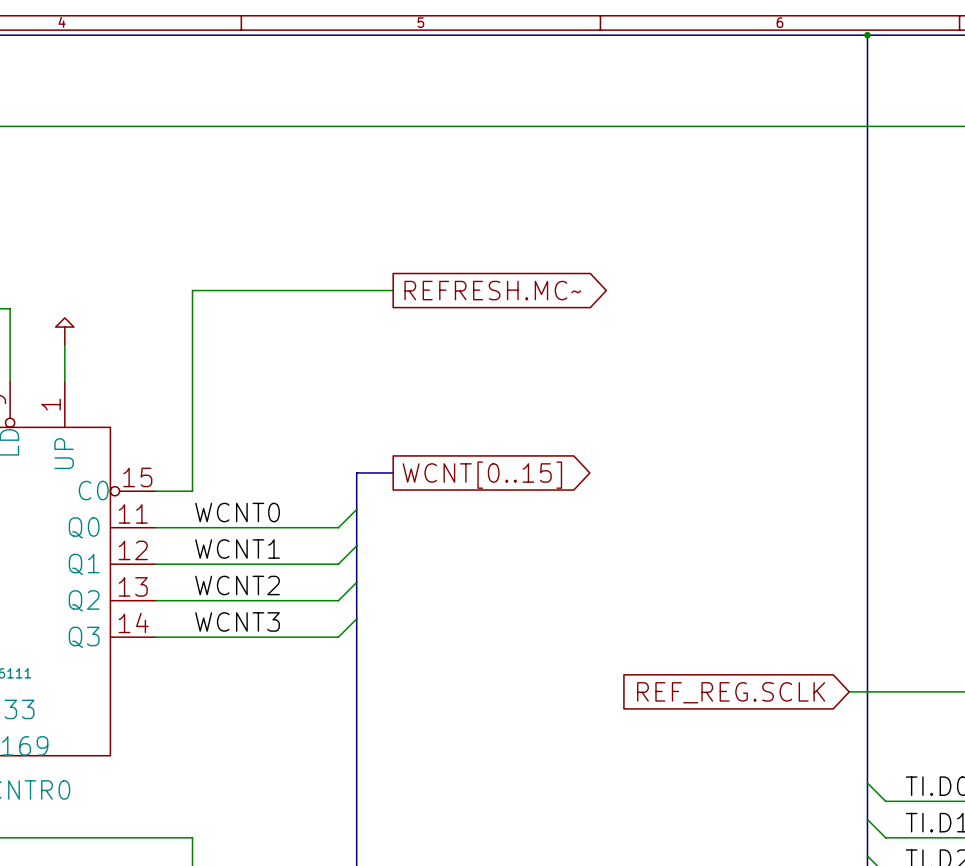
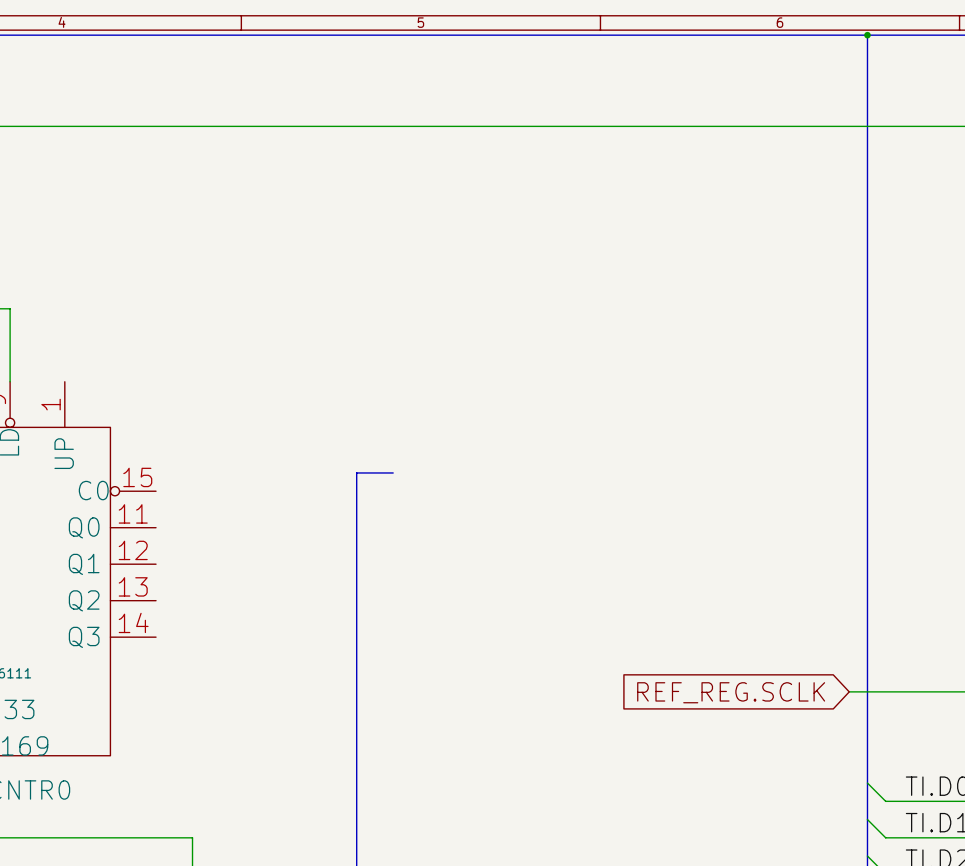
wire: (393, 290) (192, 290) (192, 491) (156, 491) -> none
global label: REFRESH.MC~ (492, 290) -> none
power symbol: (64, 331) -> none
wire: (64, 345) (64, 381) -> none
global label: WCNT[0..15] (482, 475) -> none
wire: (356, 509) (338, 527) (156, 527) -> none
label: WCNT0 (237, 512) -> none
wire: (356, 545) (338, 564) (156, 564) -> none
label: WCNT1 (237, 549) -> none
wire: (356, 582) (338, 600) (156, 600) -> none
label: WCNT2 (237, 585) -> none
wire: (356, 618) (338, 637) (156, 637) -> none
label: WCNT3 (237, 621) -> none

